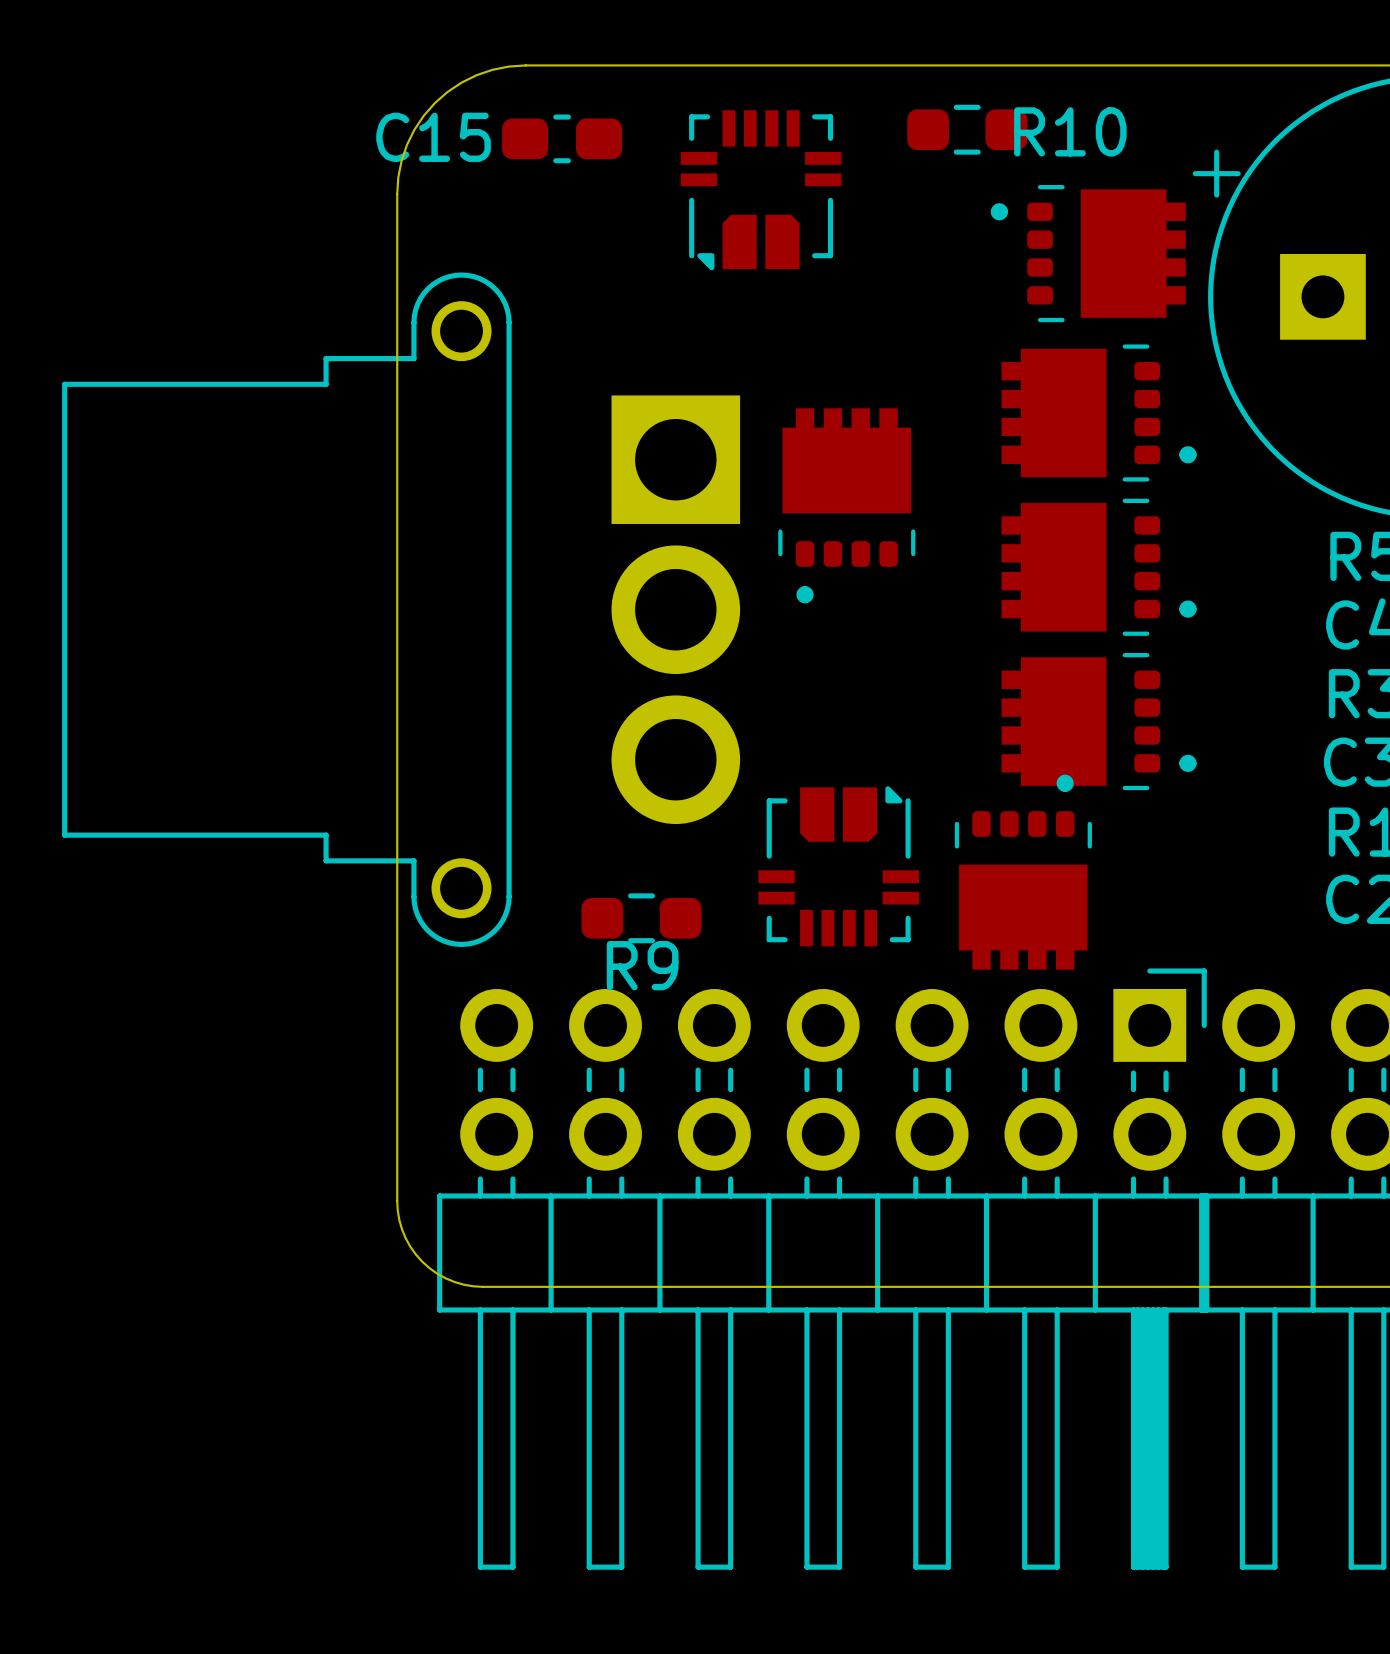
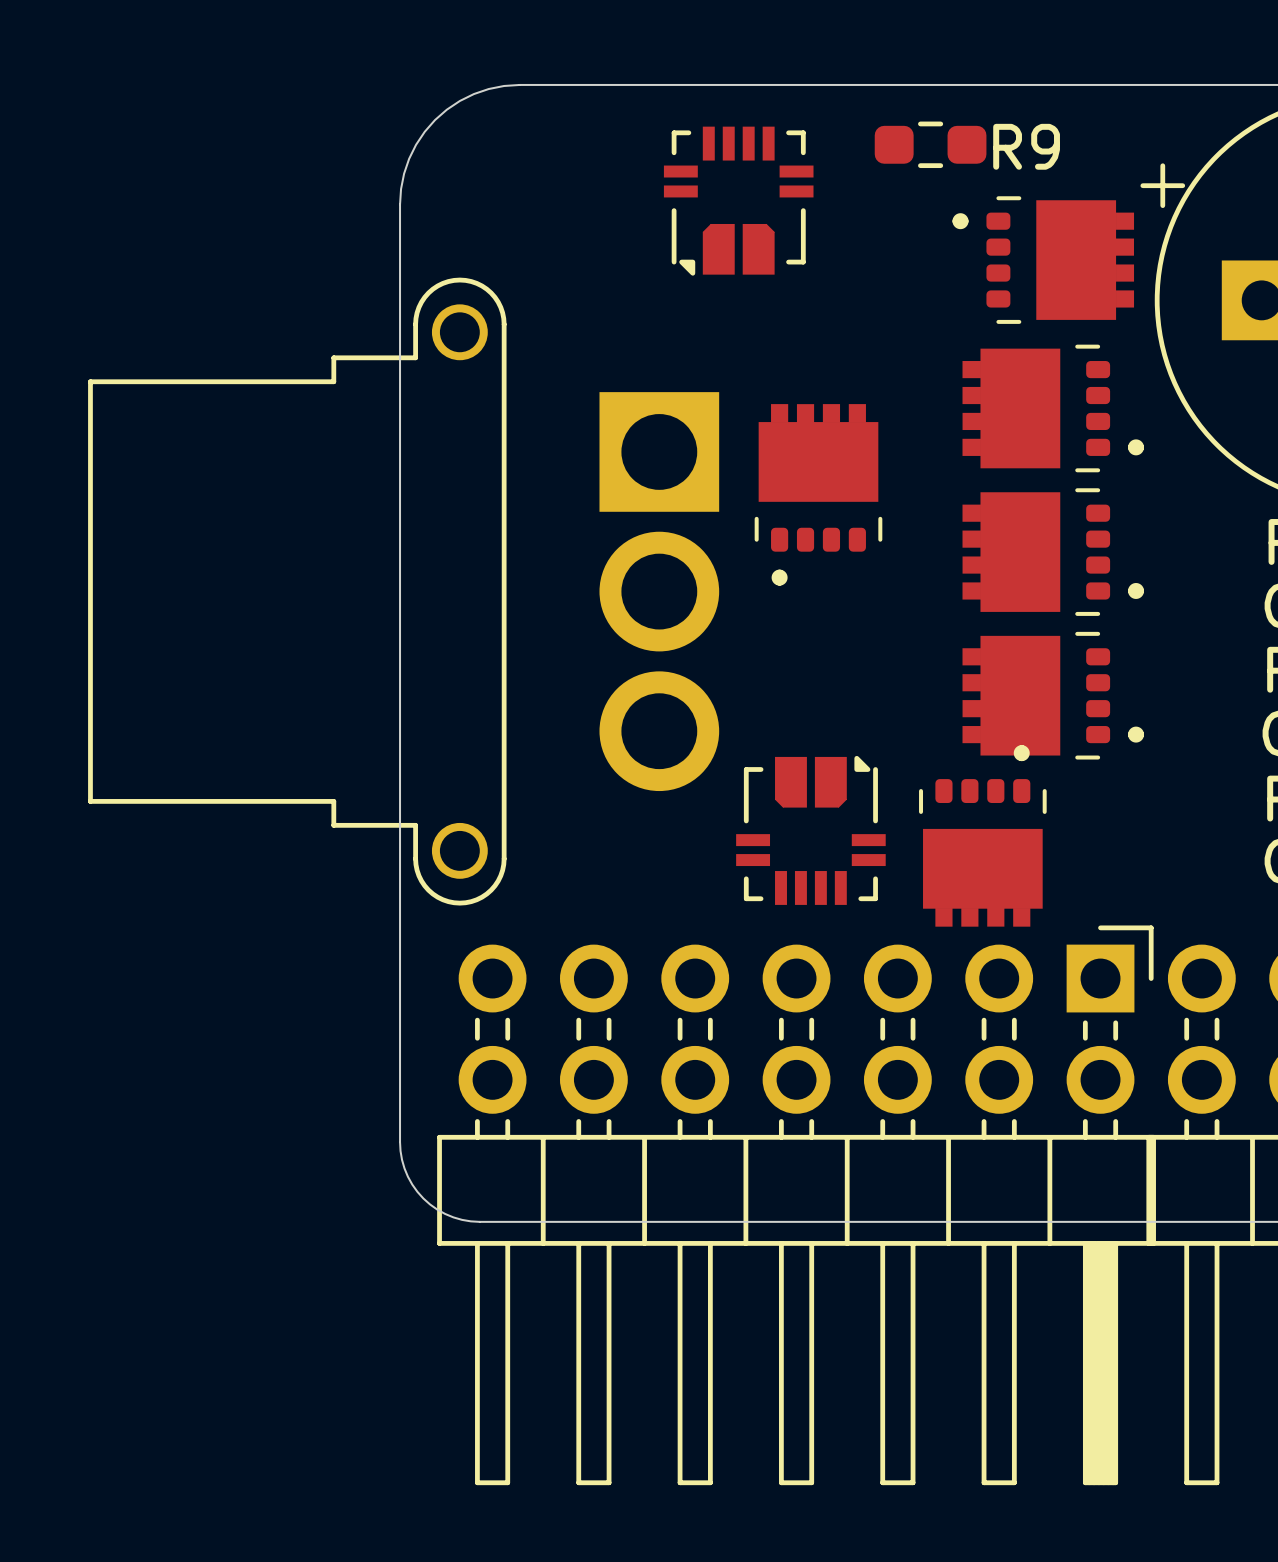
R10 name: R10 (1070, 131) -> R9 (1026, 146)
C15: (562, 138) -> none
R9: (641, 918) -> none

